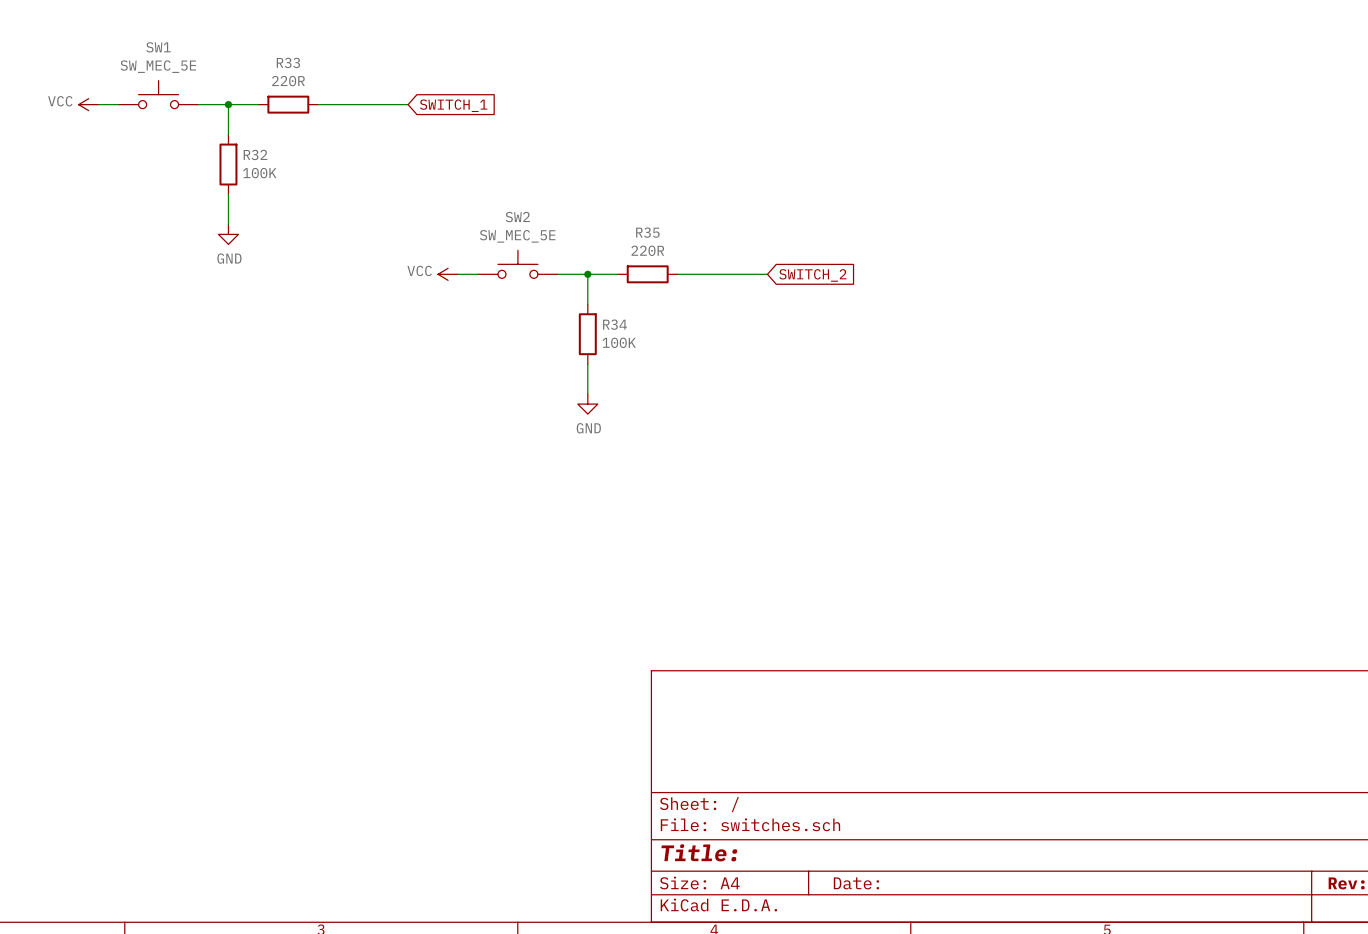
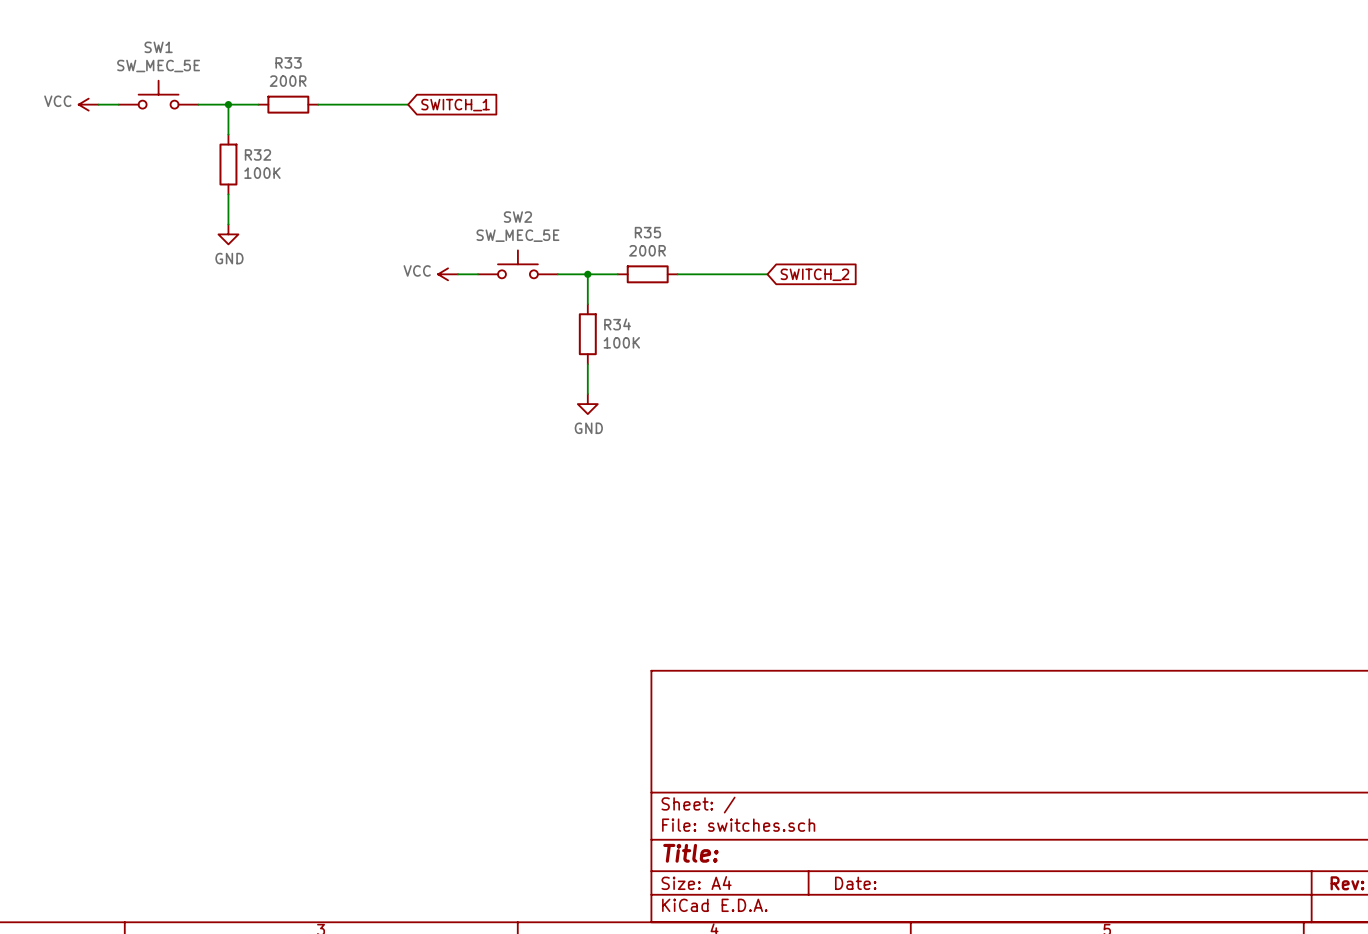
R33 value: 220R (288, 81) -> 200R (288, 81)
R35 value: 220R (647, 250) -> 200R (647, 250)

